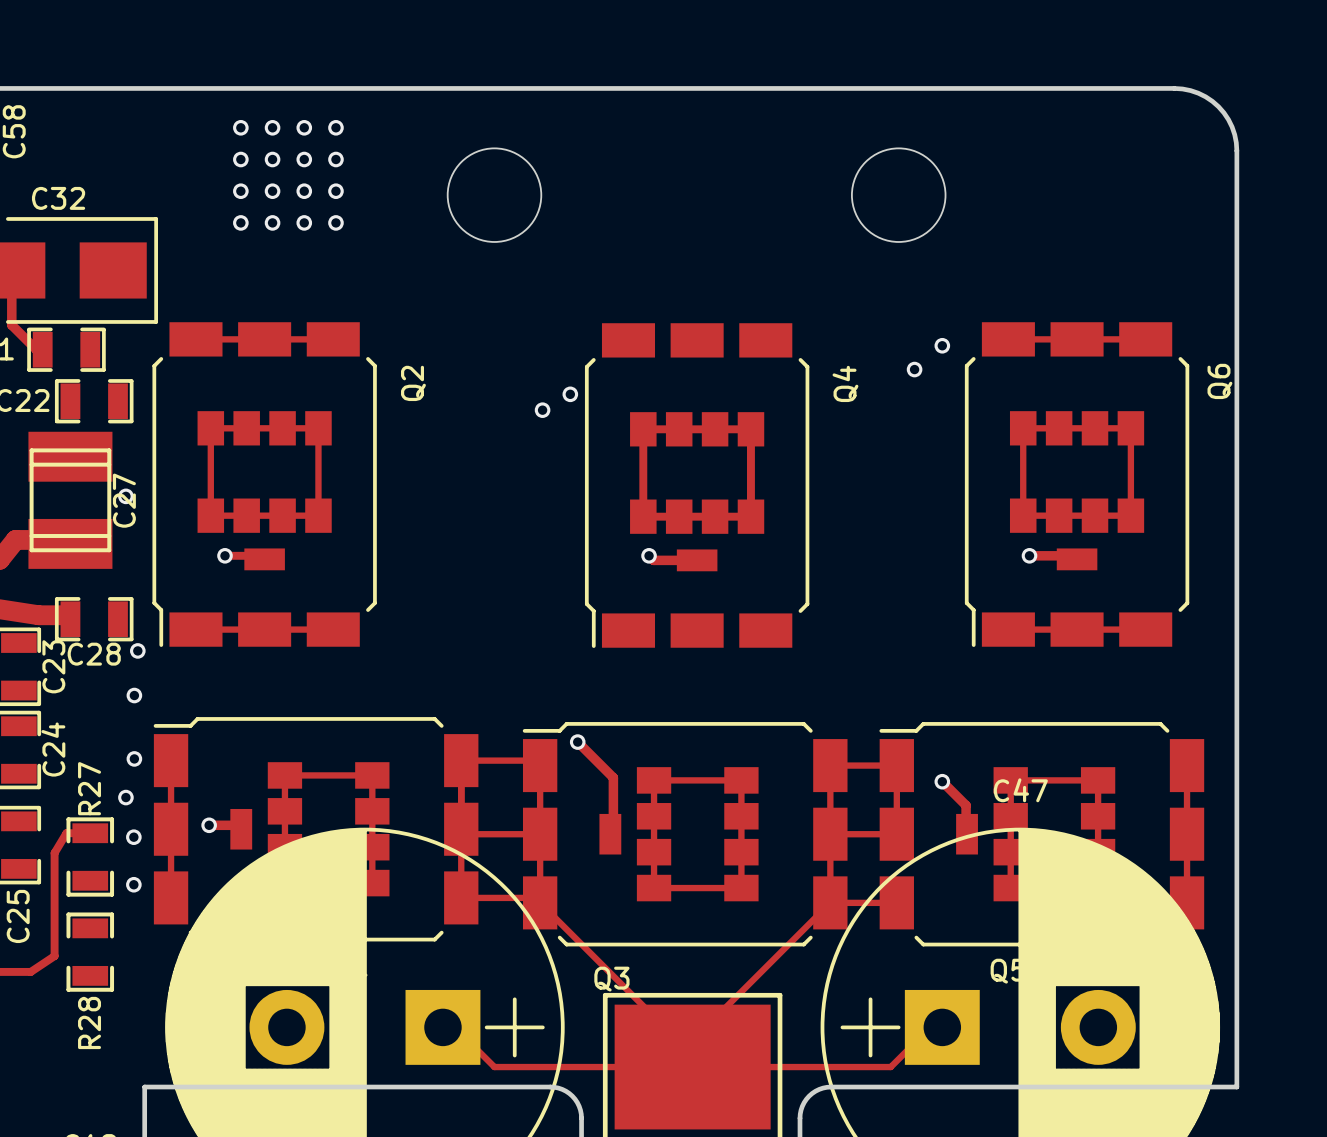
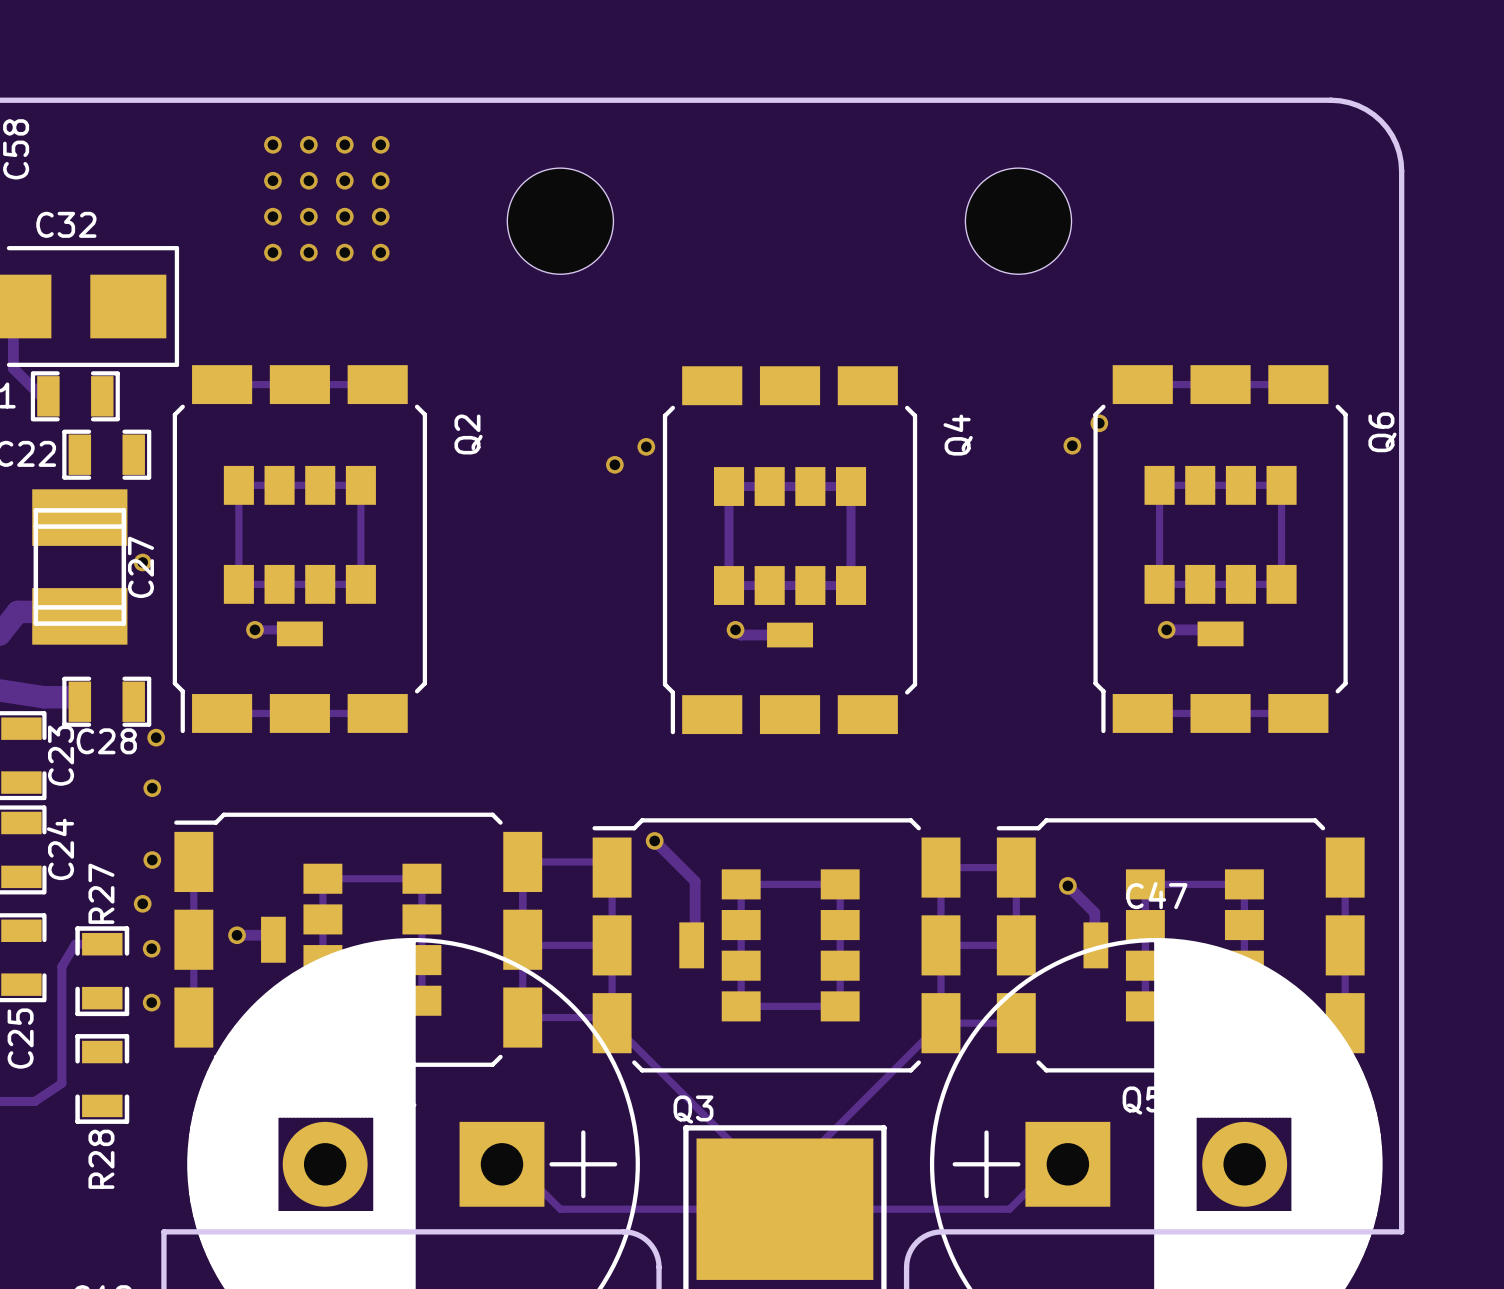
via: (942, 345) -> none
via: (914, 369) -> none
via: none -> (1099, 423)
via: none -> (1072, 445)

